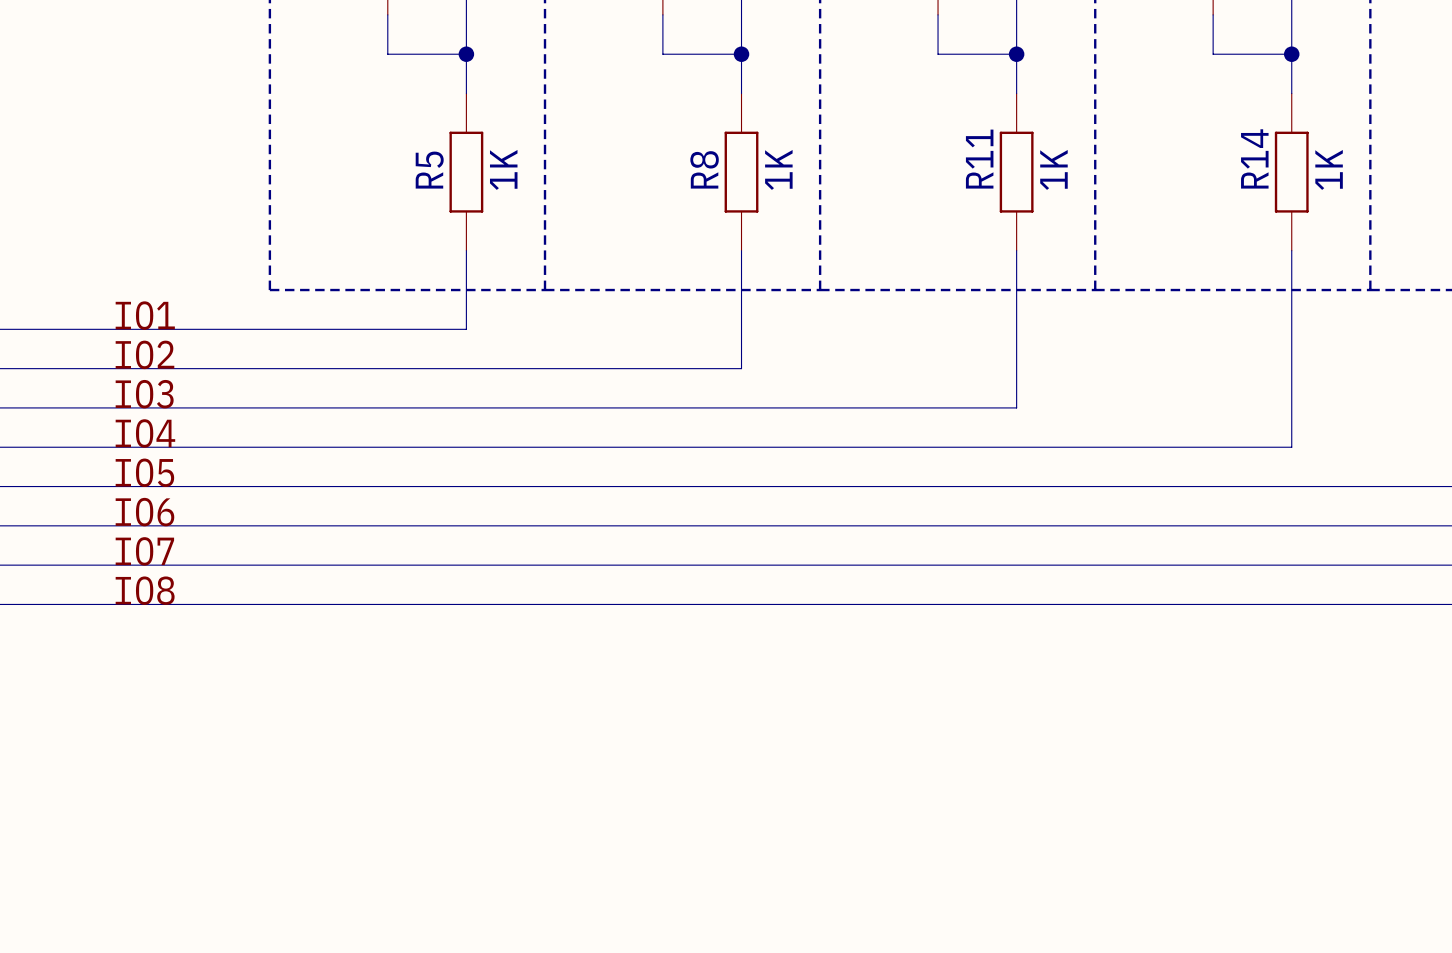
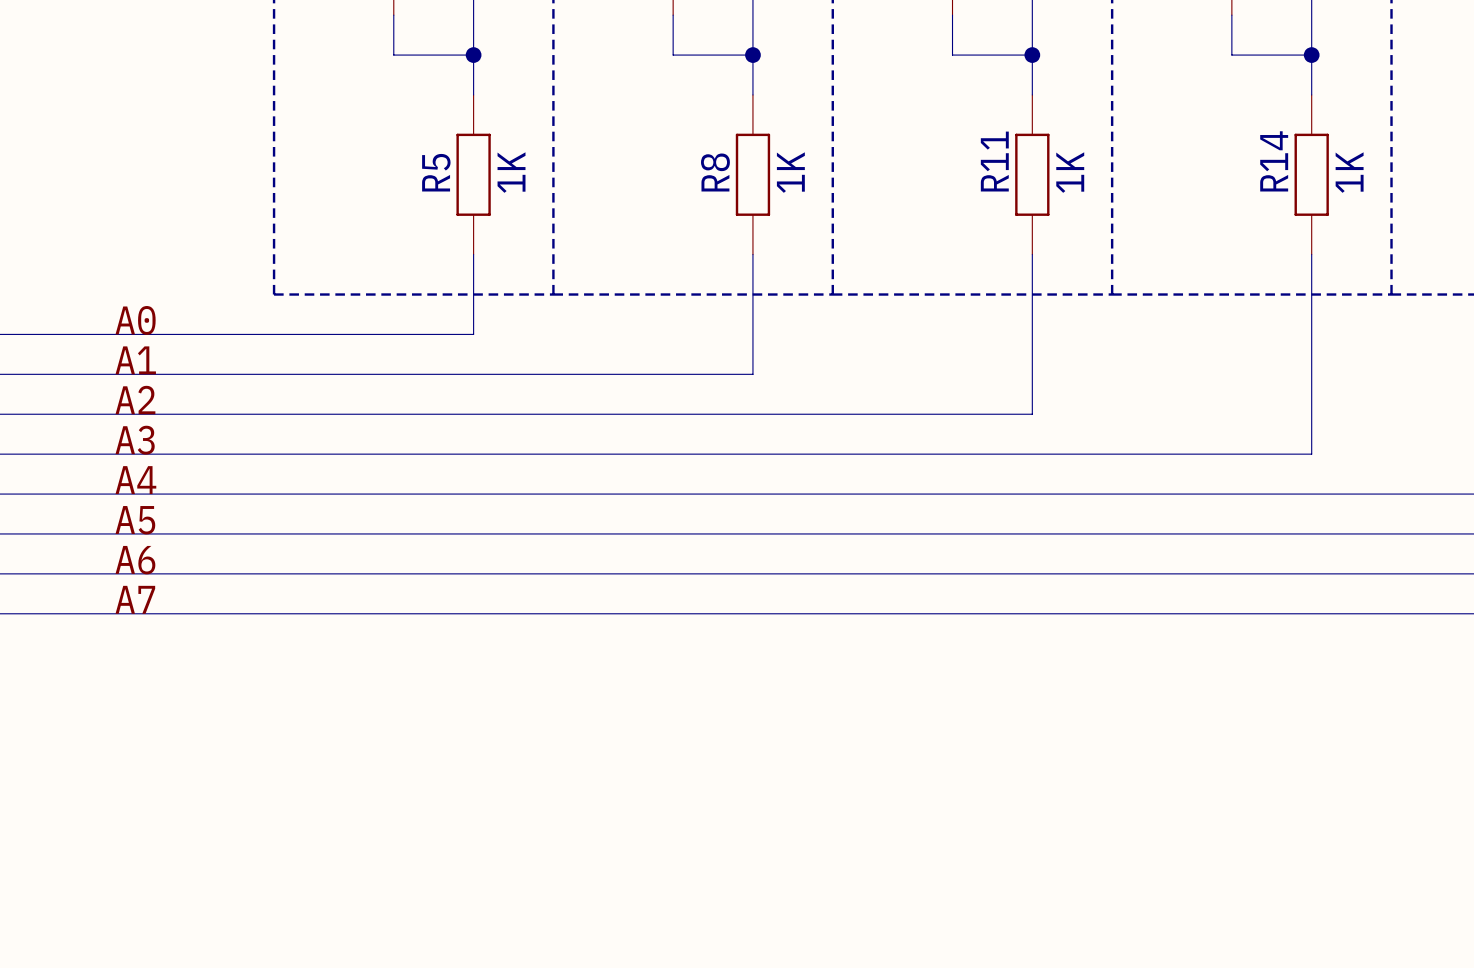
label: IO1 (145, 315) -> A0 (135, 320)
label: IO2 (144, 354) -> A1 (135, 360)
label: IO3 (144, 394) -> A2 (135, 400)
label: IO4 (145, 433) -> A3 (135, 440)
label: IO5 (144, 472) -> A4 (135, 480)
label: IO6 (144, 512) -> A5 (135, 520)
label: IO7 (144, 551) -> A6 (135, 560)
label: IO8 (145, 590) -> A7 (135, 599)

